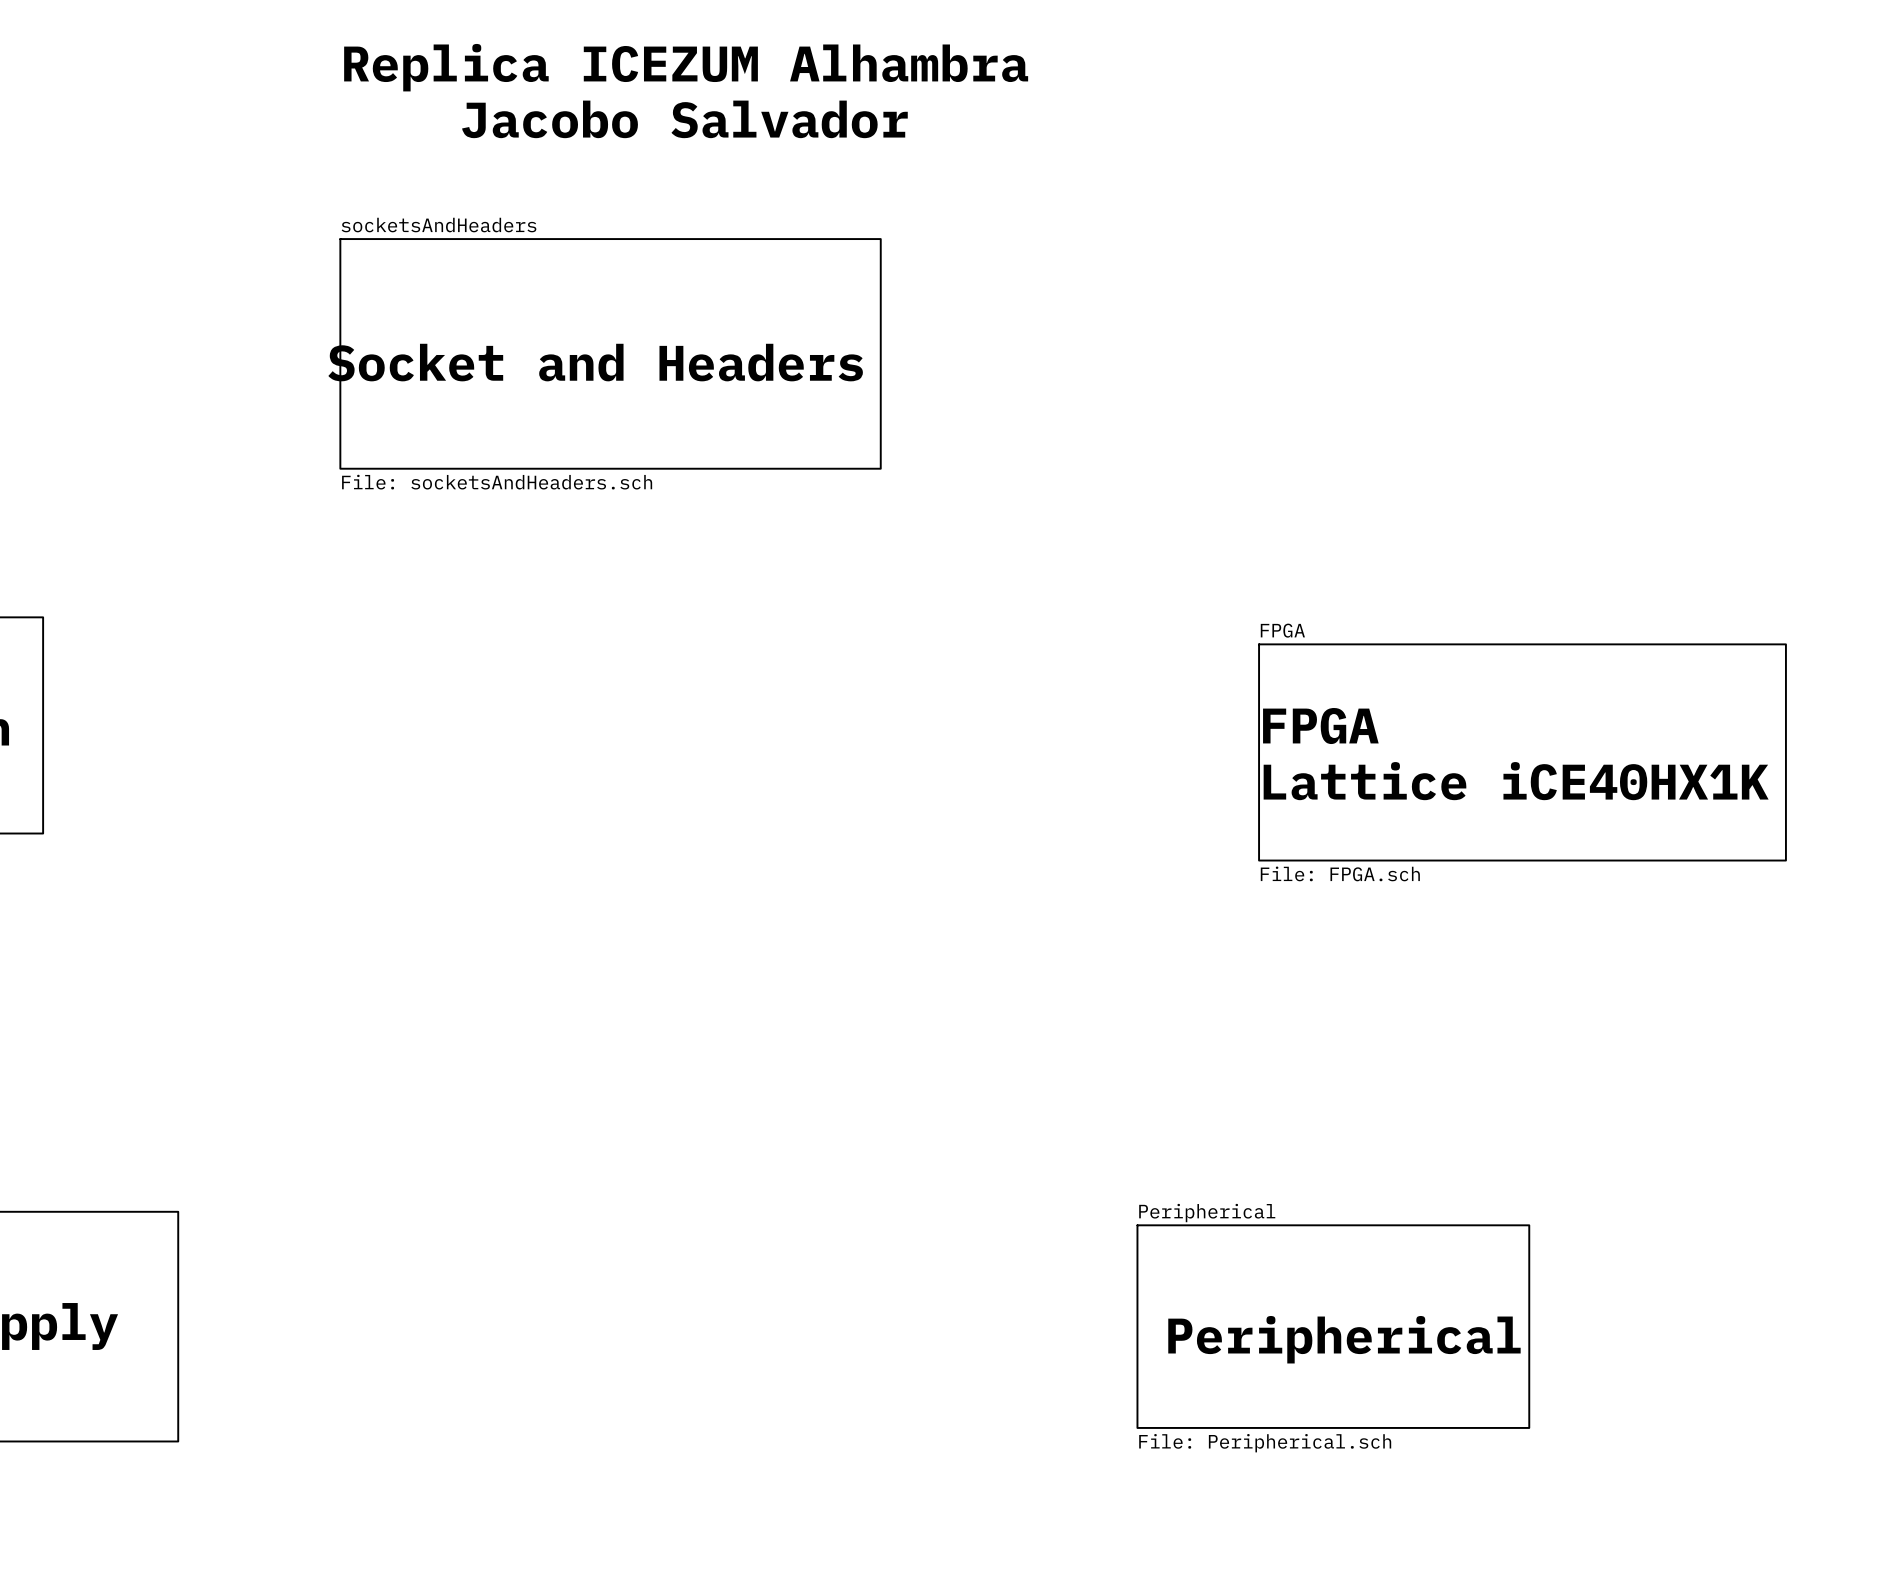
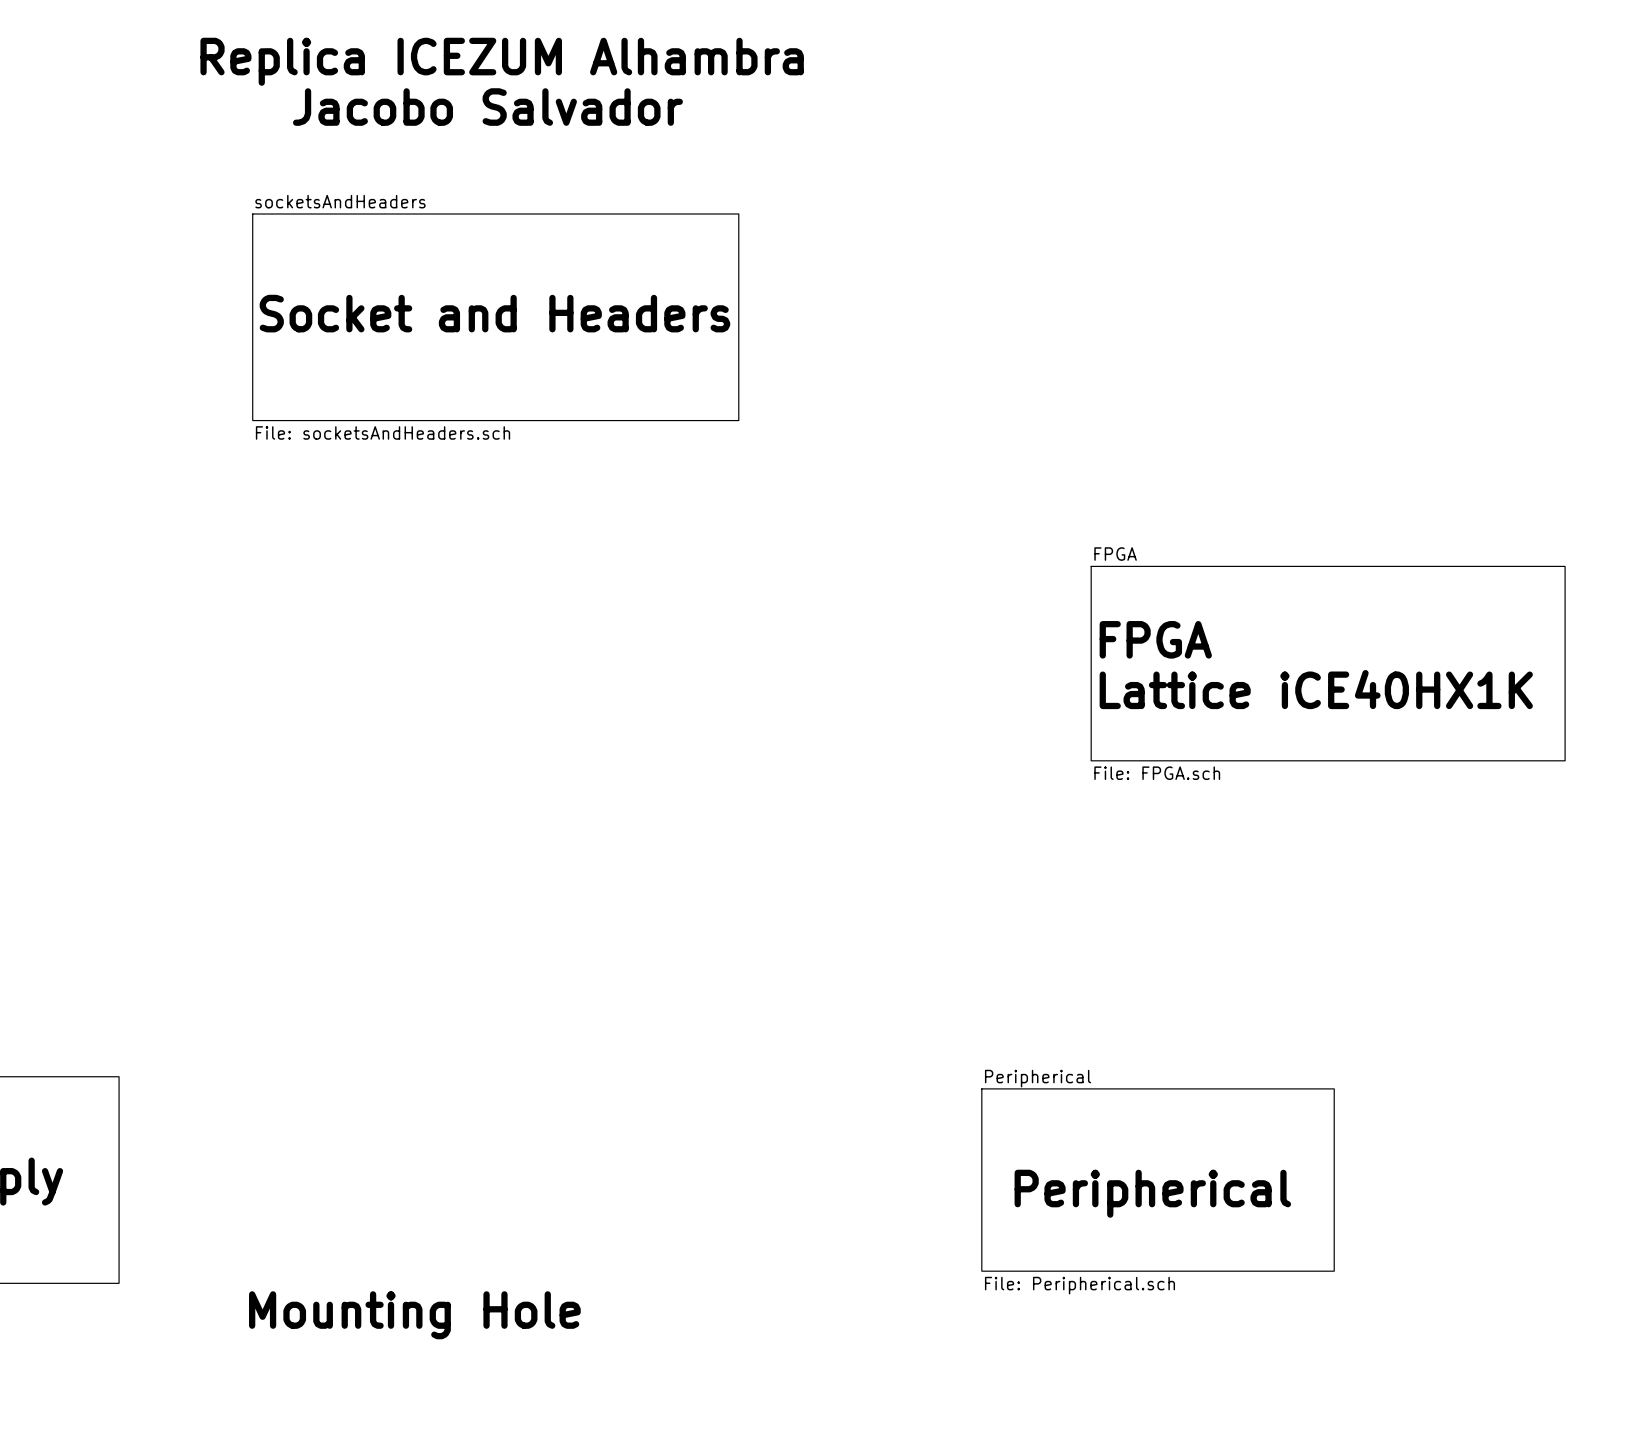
text position: Replica ICEZUM Alhambra (686, 67) -> Replica ICEZUM Alhambra (502, 61)
text position: Jacobo Salvador (684, 119) -> Jacobo Salvador (487, 107)
sheet socketsAndHeaders position: (610, 353) -> (495, 317)
text: none -> Mounting Hole (414, 1315)

